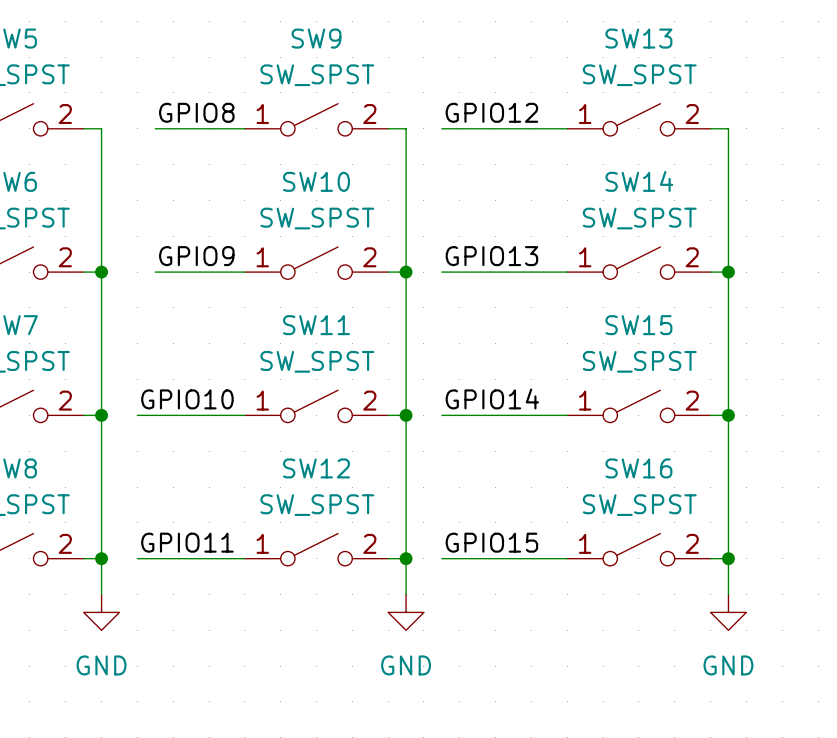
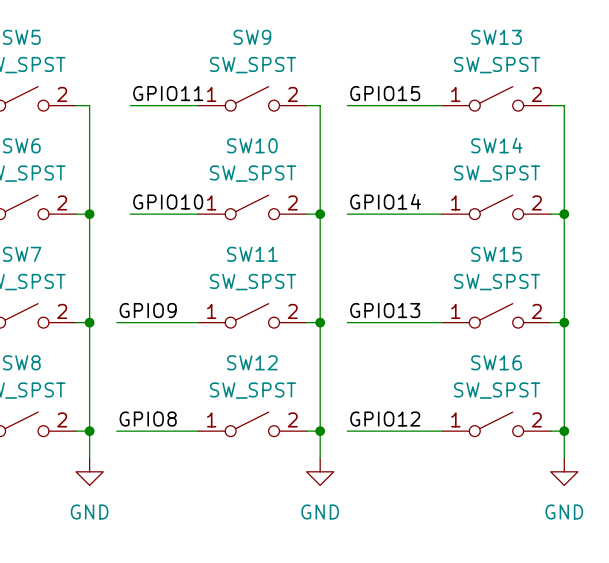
label: GPIO8 (196, 112) -> GPIO11 (168, 93)
label: GPIO12 (491, 112) -> GPIO15 (385, 93)
label: GPIO9 (196, 256) -> GPIO10 (168, 202)
label: GPIO13 (491, 256) -> GPIO14 (385, 201)
label: GPIO14 (492, 398) -> GPIO13 (385, 310)
label: GPIO10 (187, 399) -> GPIO9 (148, 310)
label: GPIO11 (187, 542) -> GPIO8 (148, 419)
label: GPIO15 (491, 542) -> GPIO12 (385, 419)

